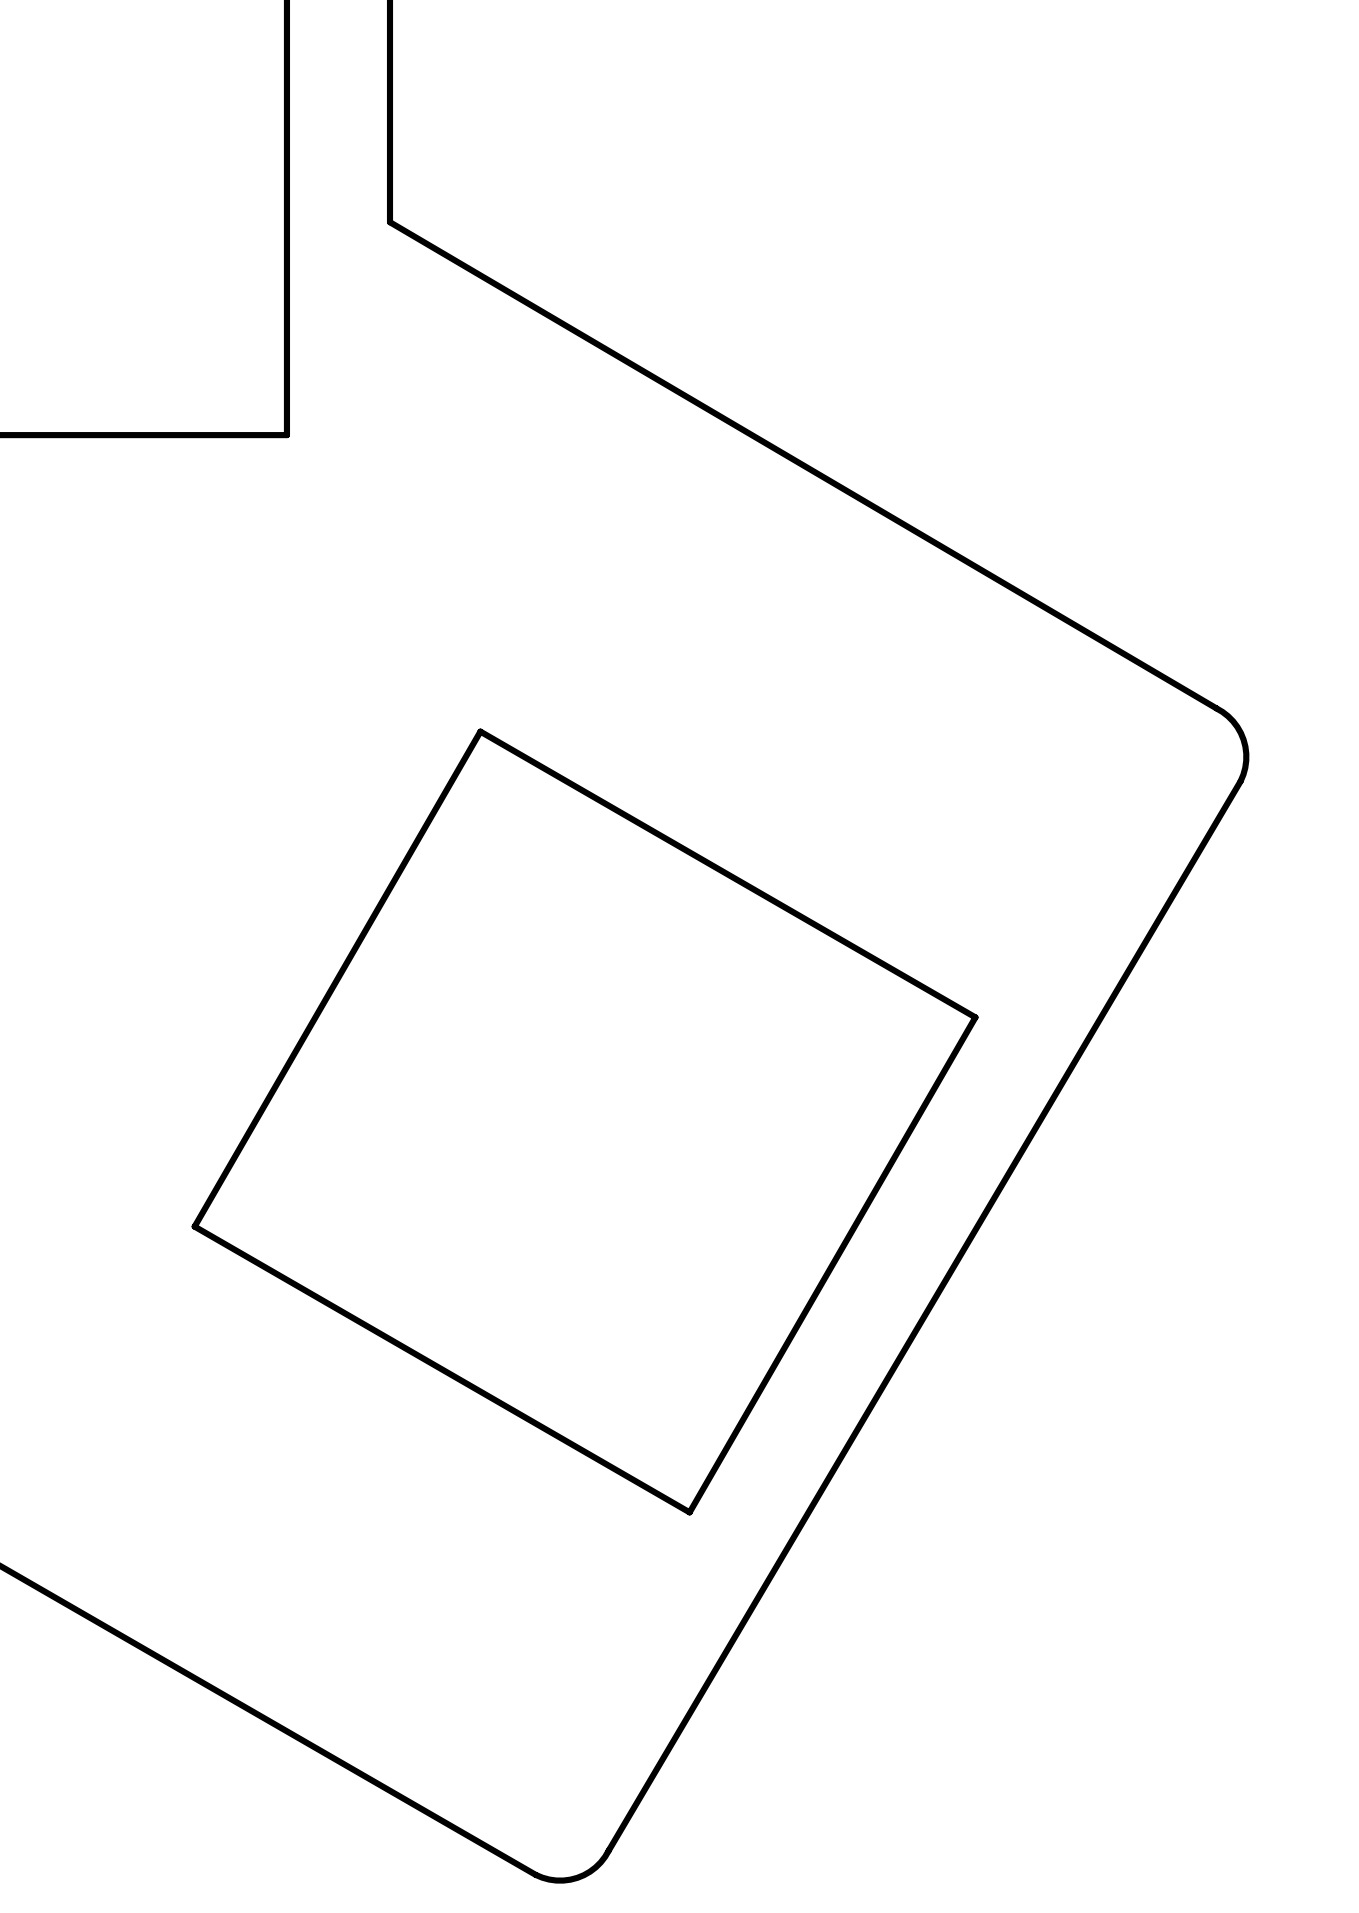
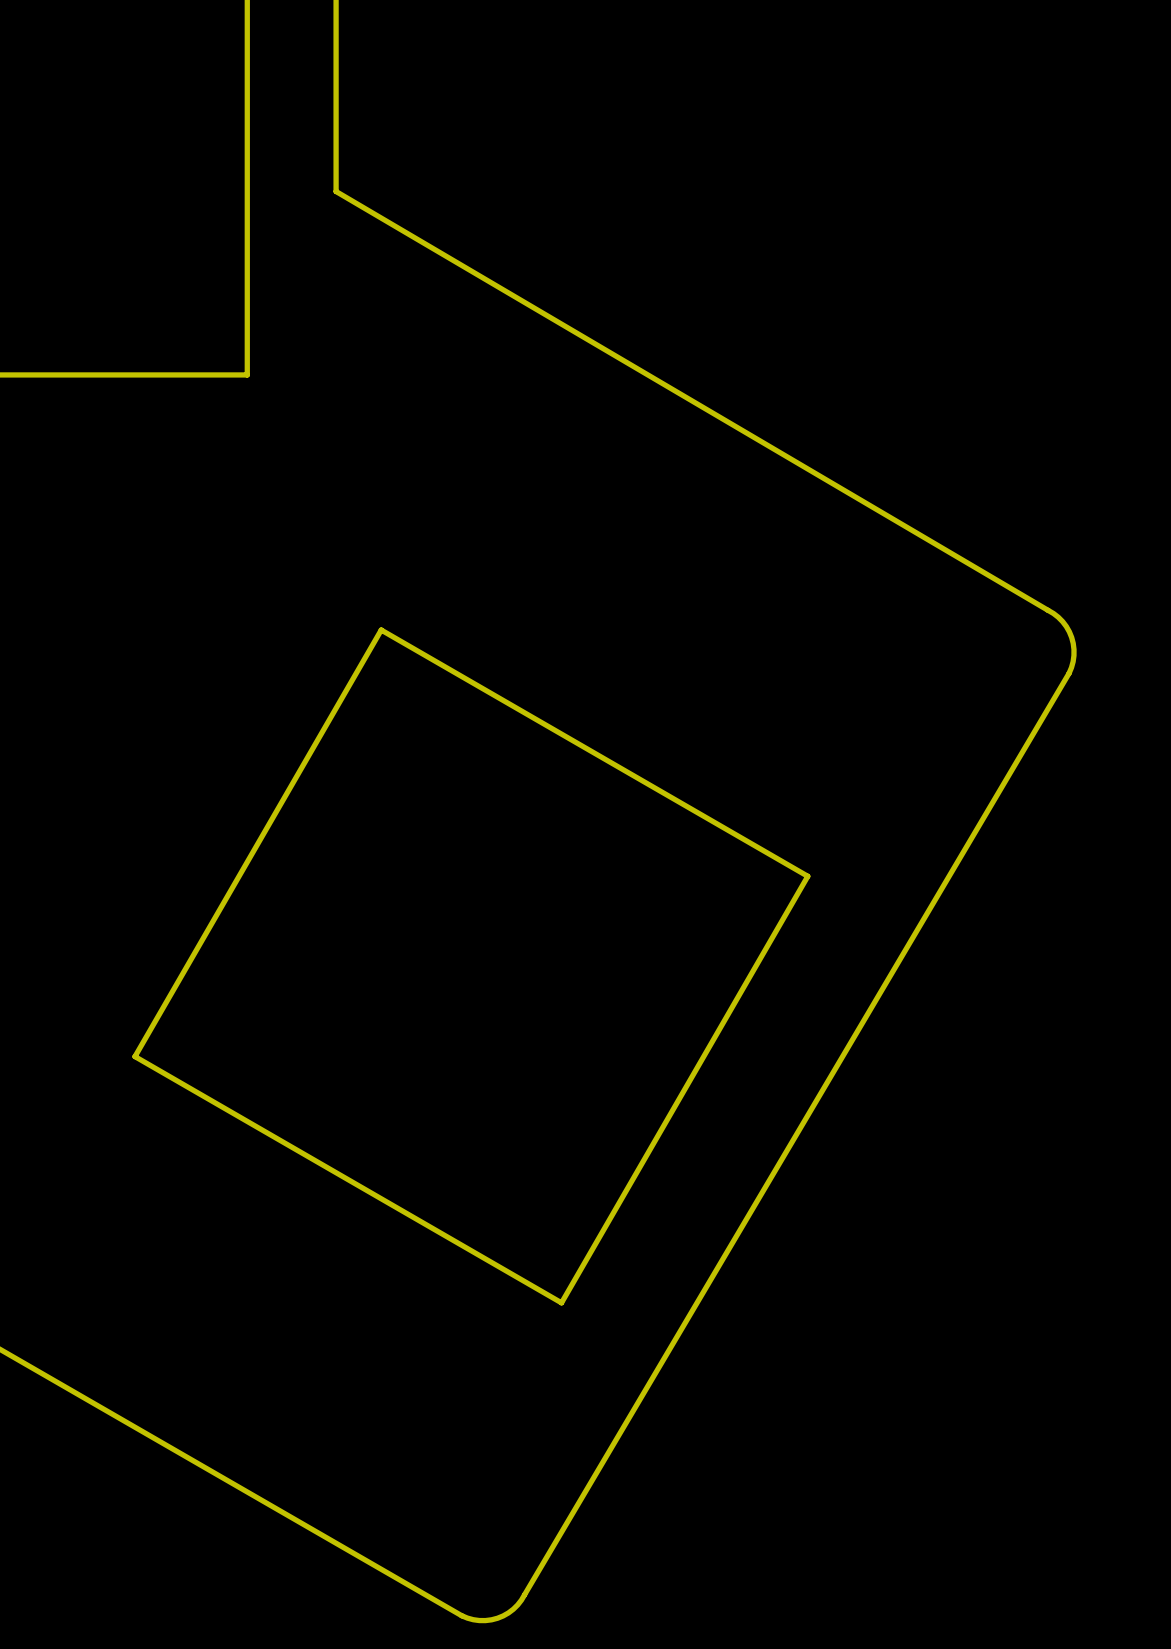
board edge: (480, 731) (194, 1226) (689, 1512) (975, 1017) (480, 731) -> (381, 630) (134, 1056) (561, 1302) (807, 876) (381, 630)

